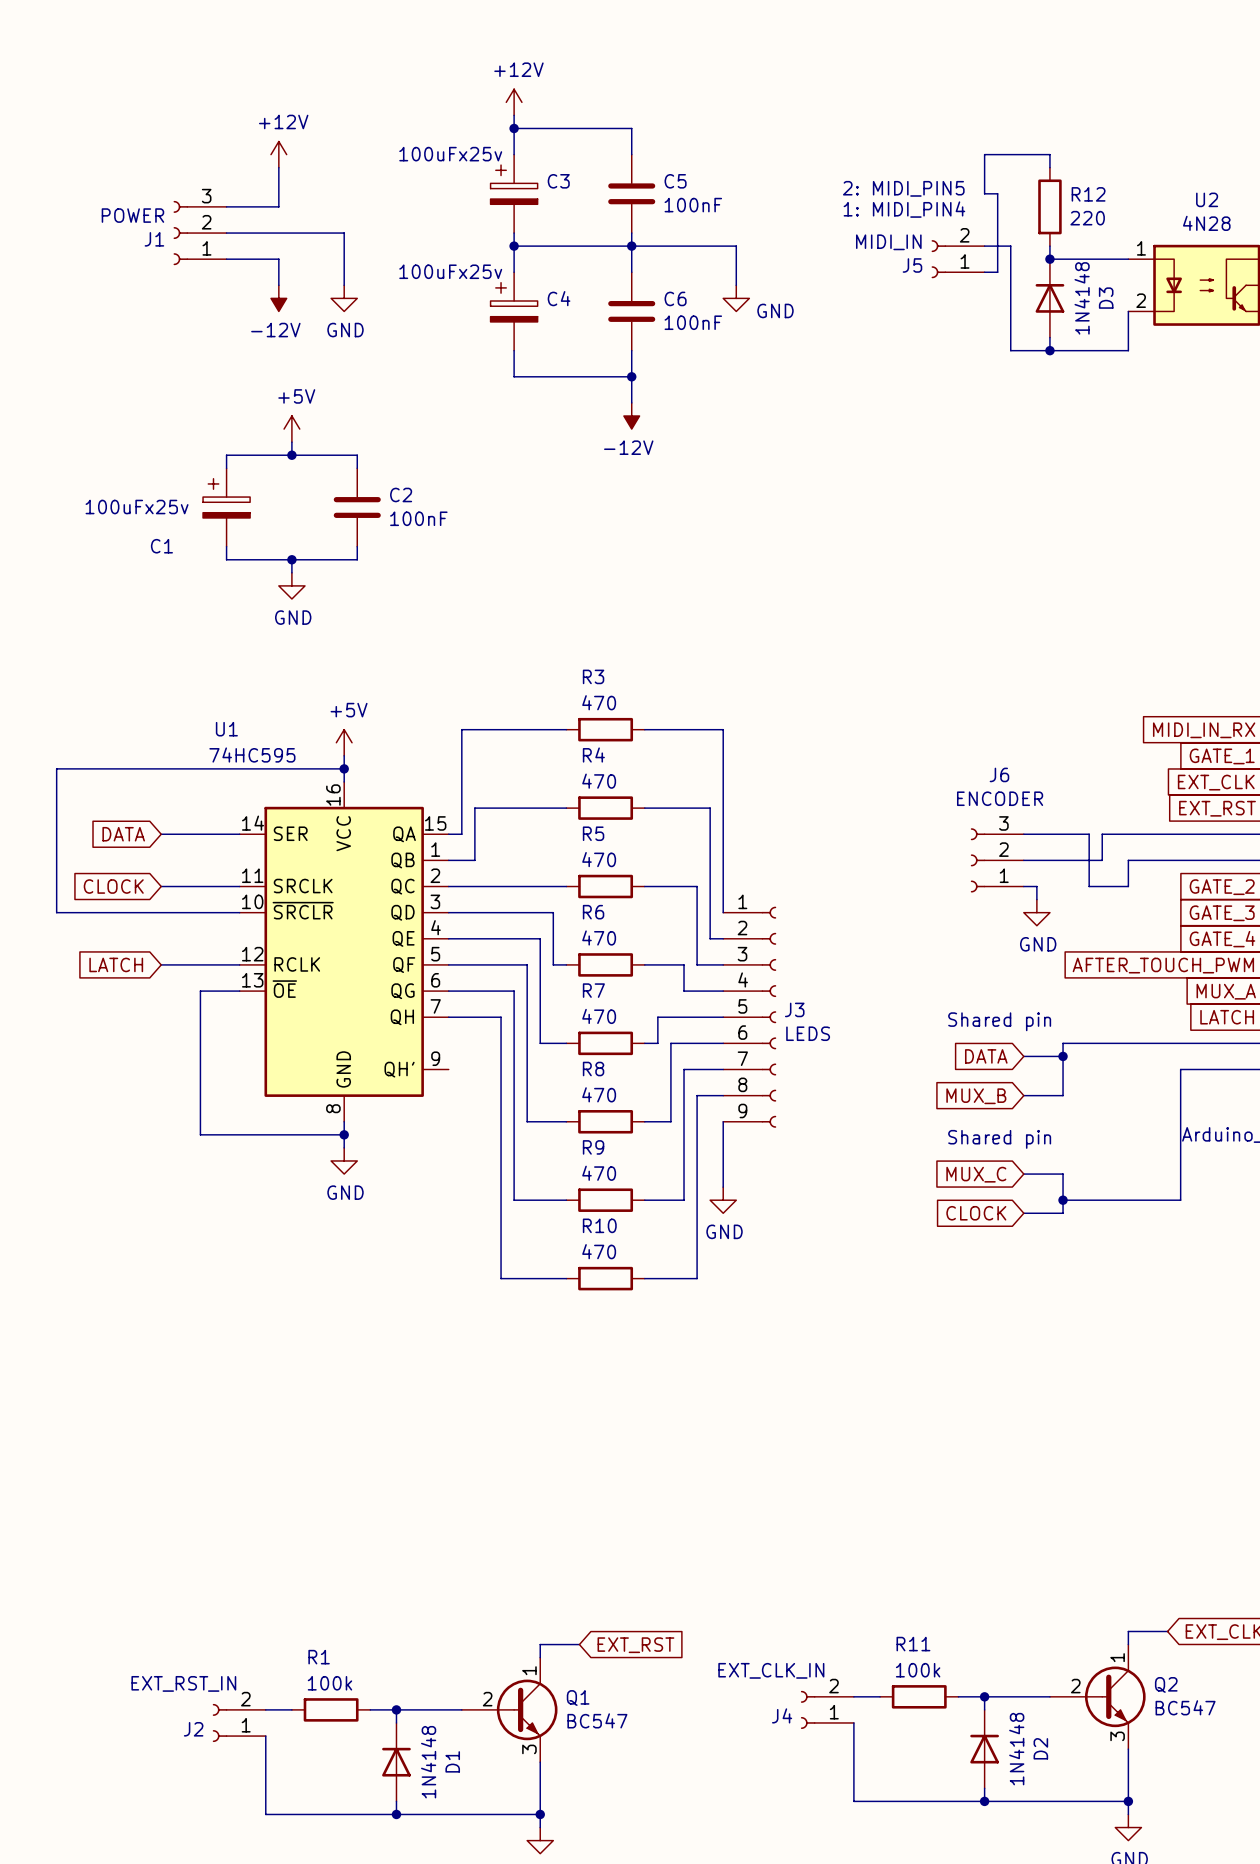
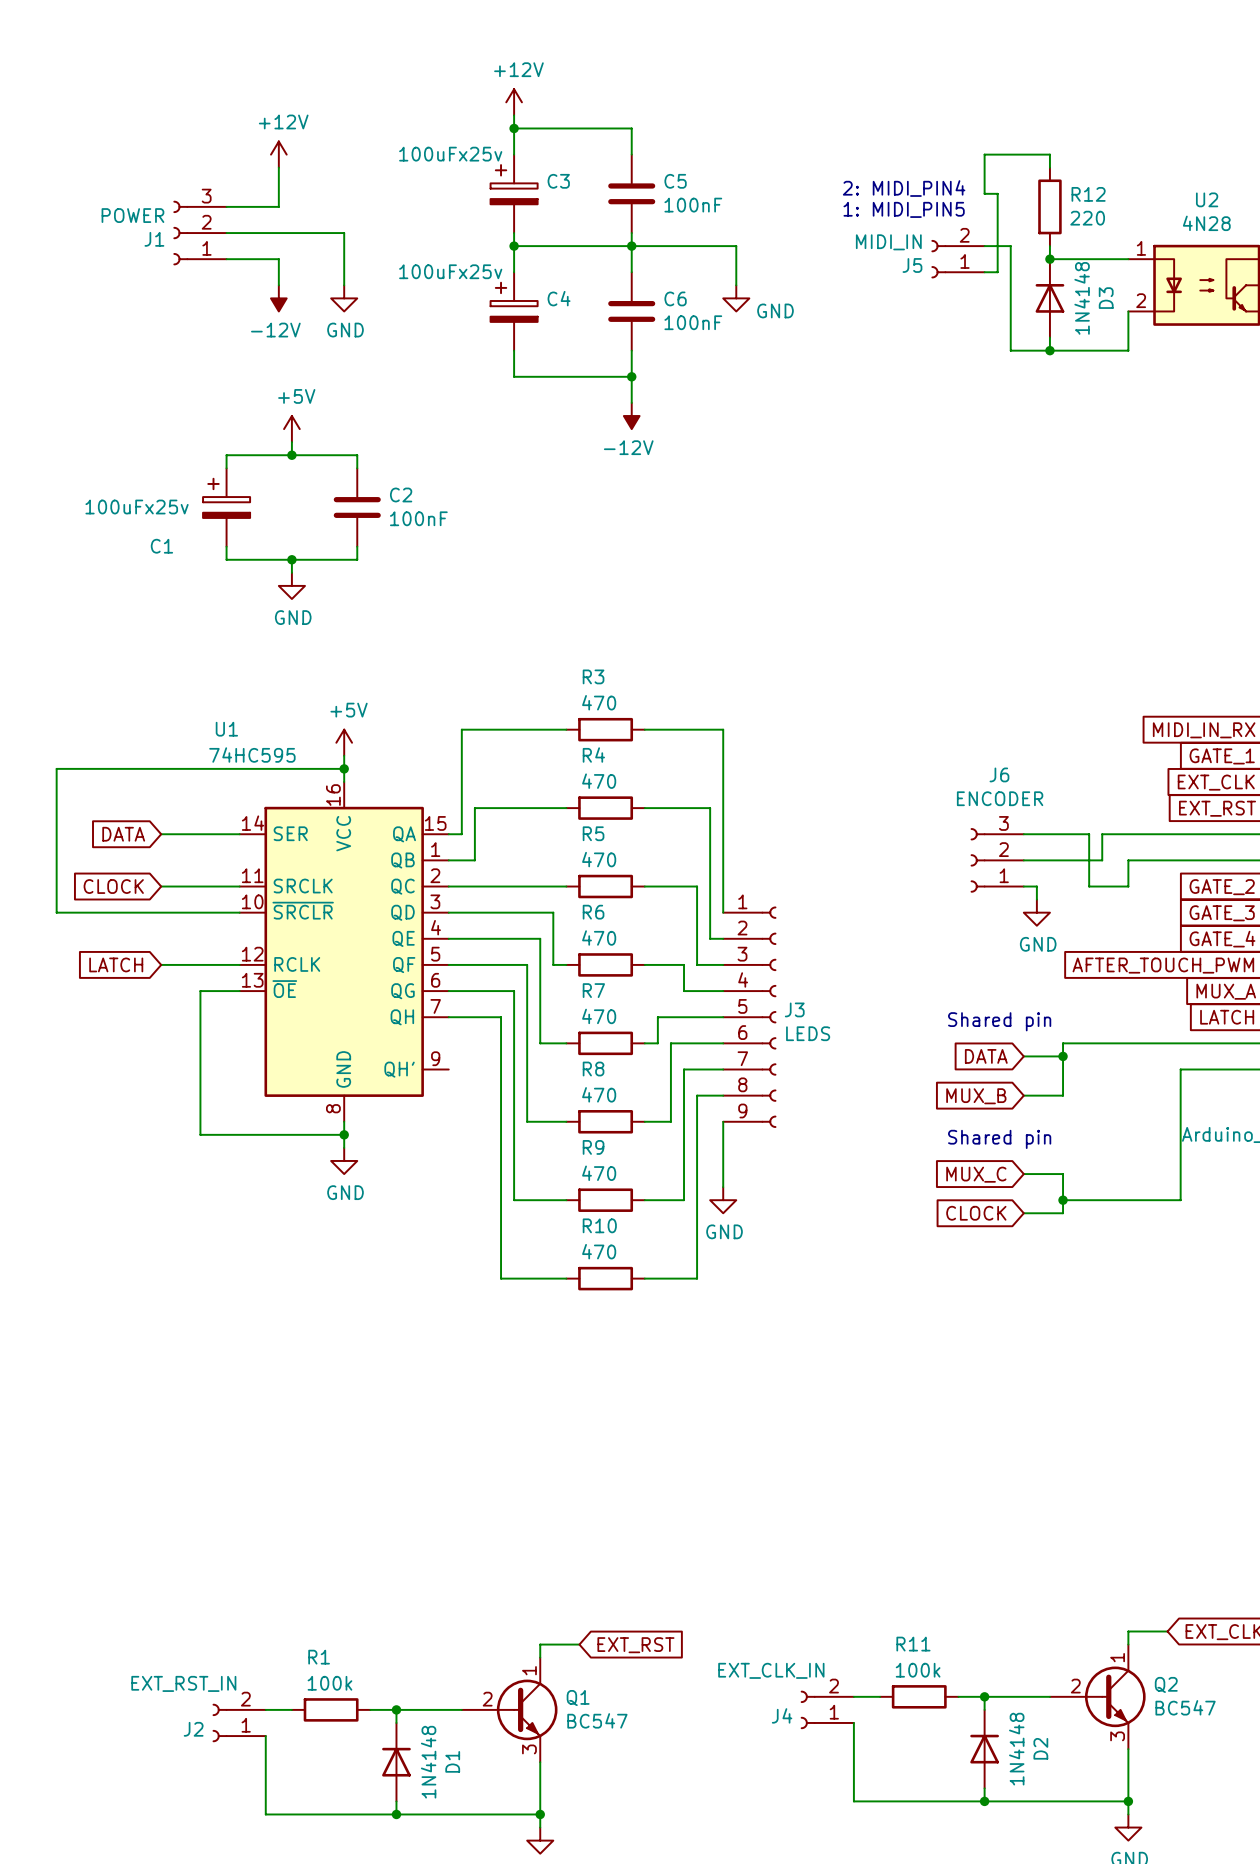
text: 2: MIDI_PIN5 (903, 188) -> 2: MIDI_PIN4 (904, 188)
text: 1: MIDI_PIN4 (904, 209) -> 1: MIDI_PIN5 (904, 209)

